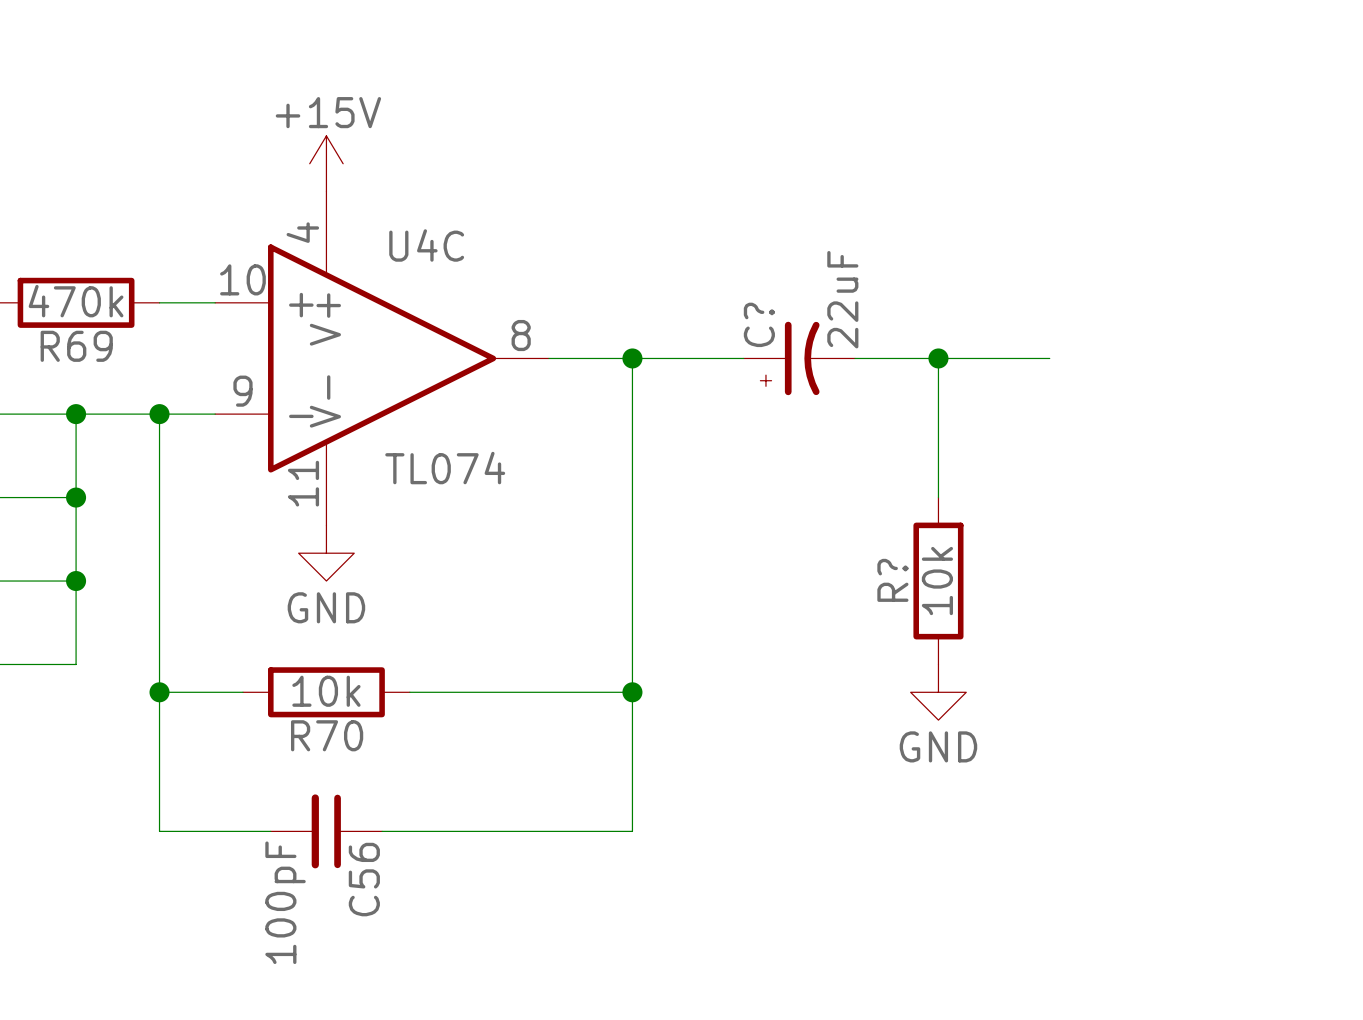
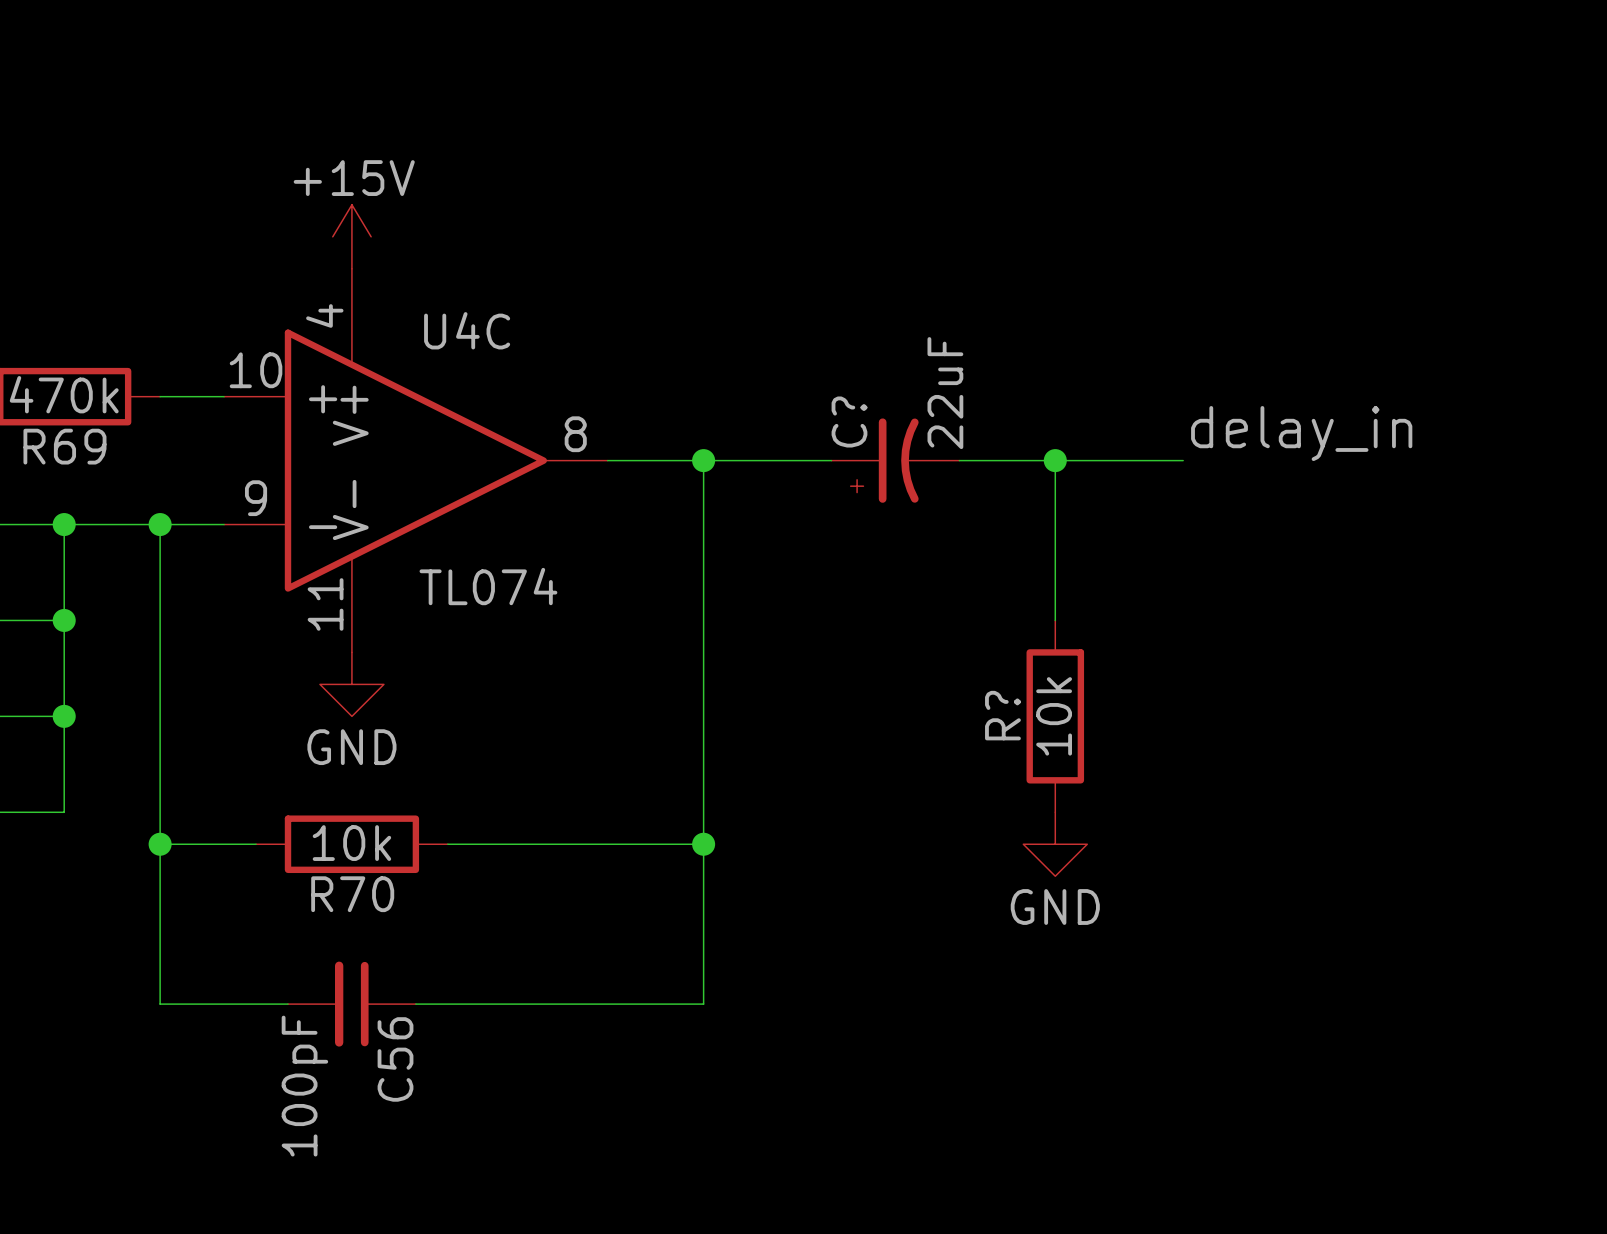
label: none -> delay_in (1301, 433)

